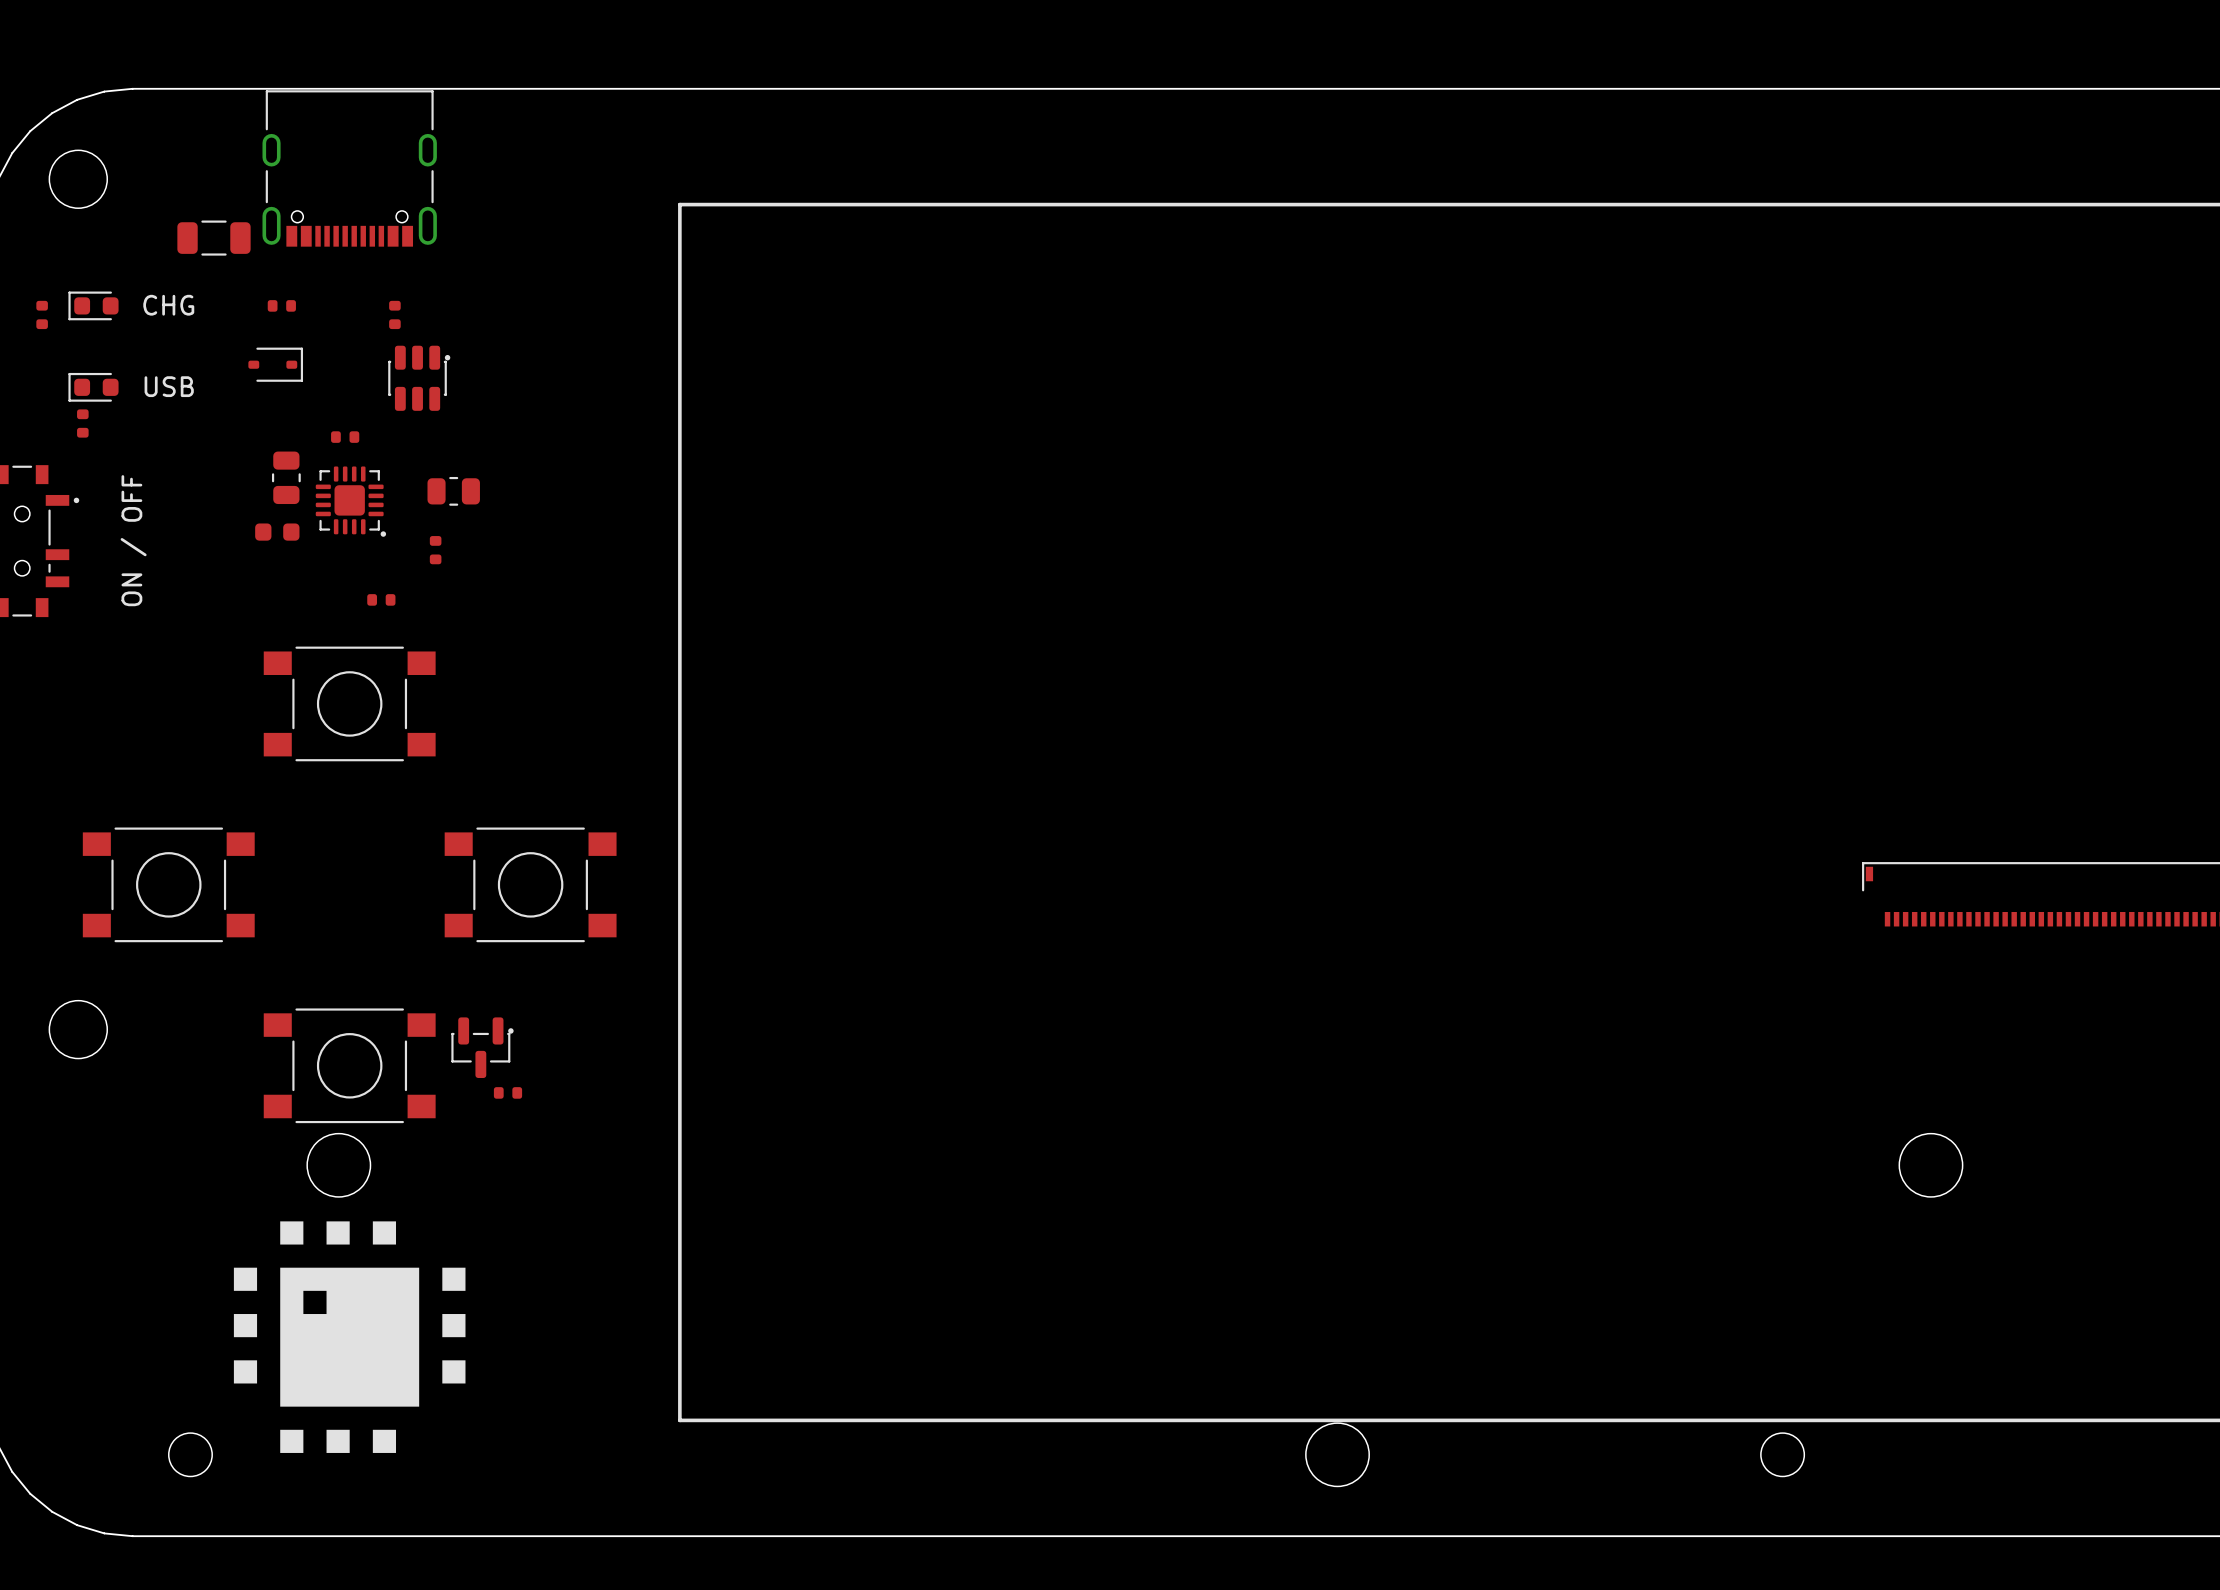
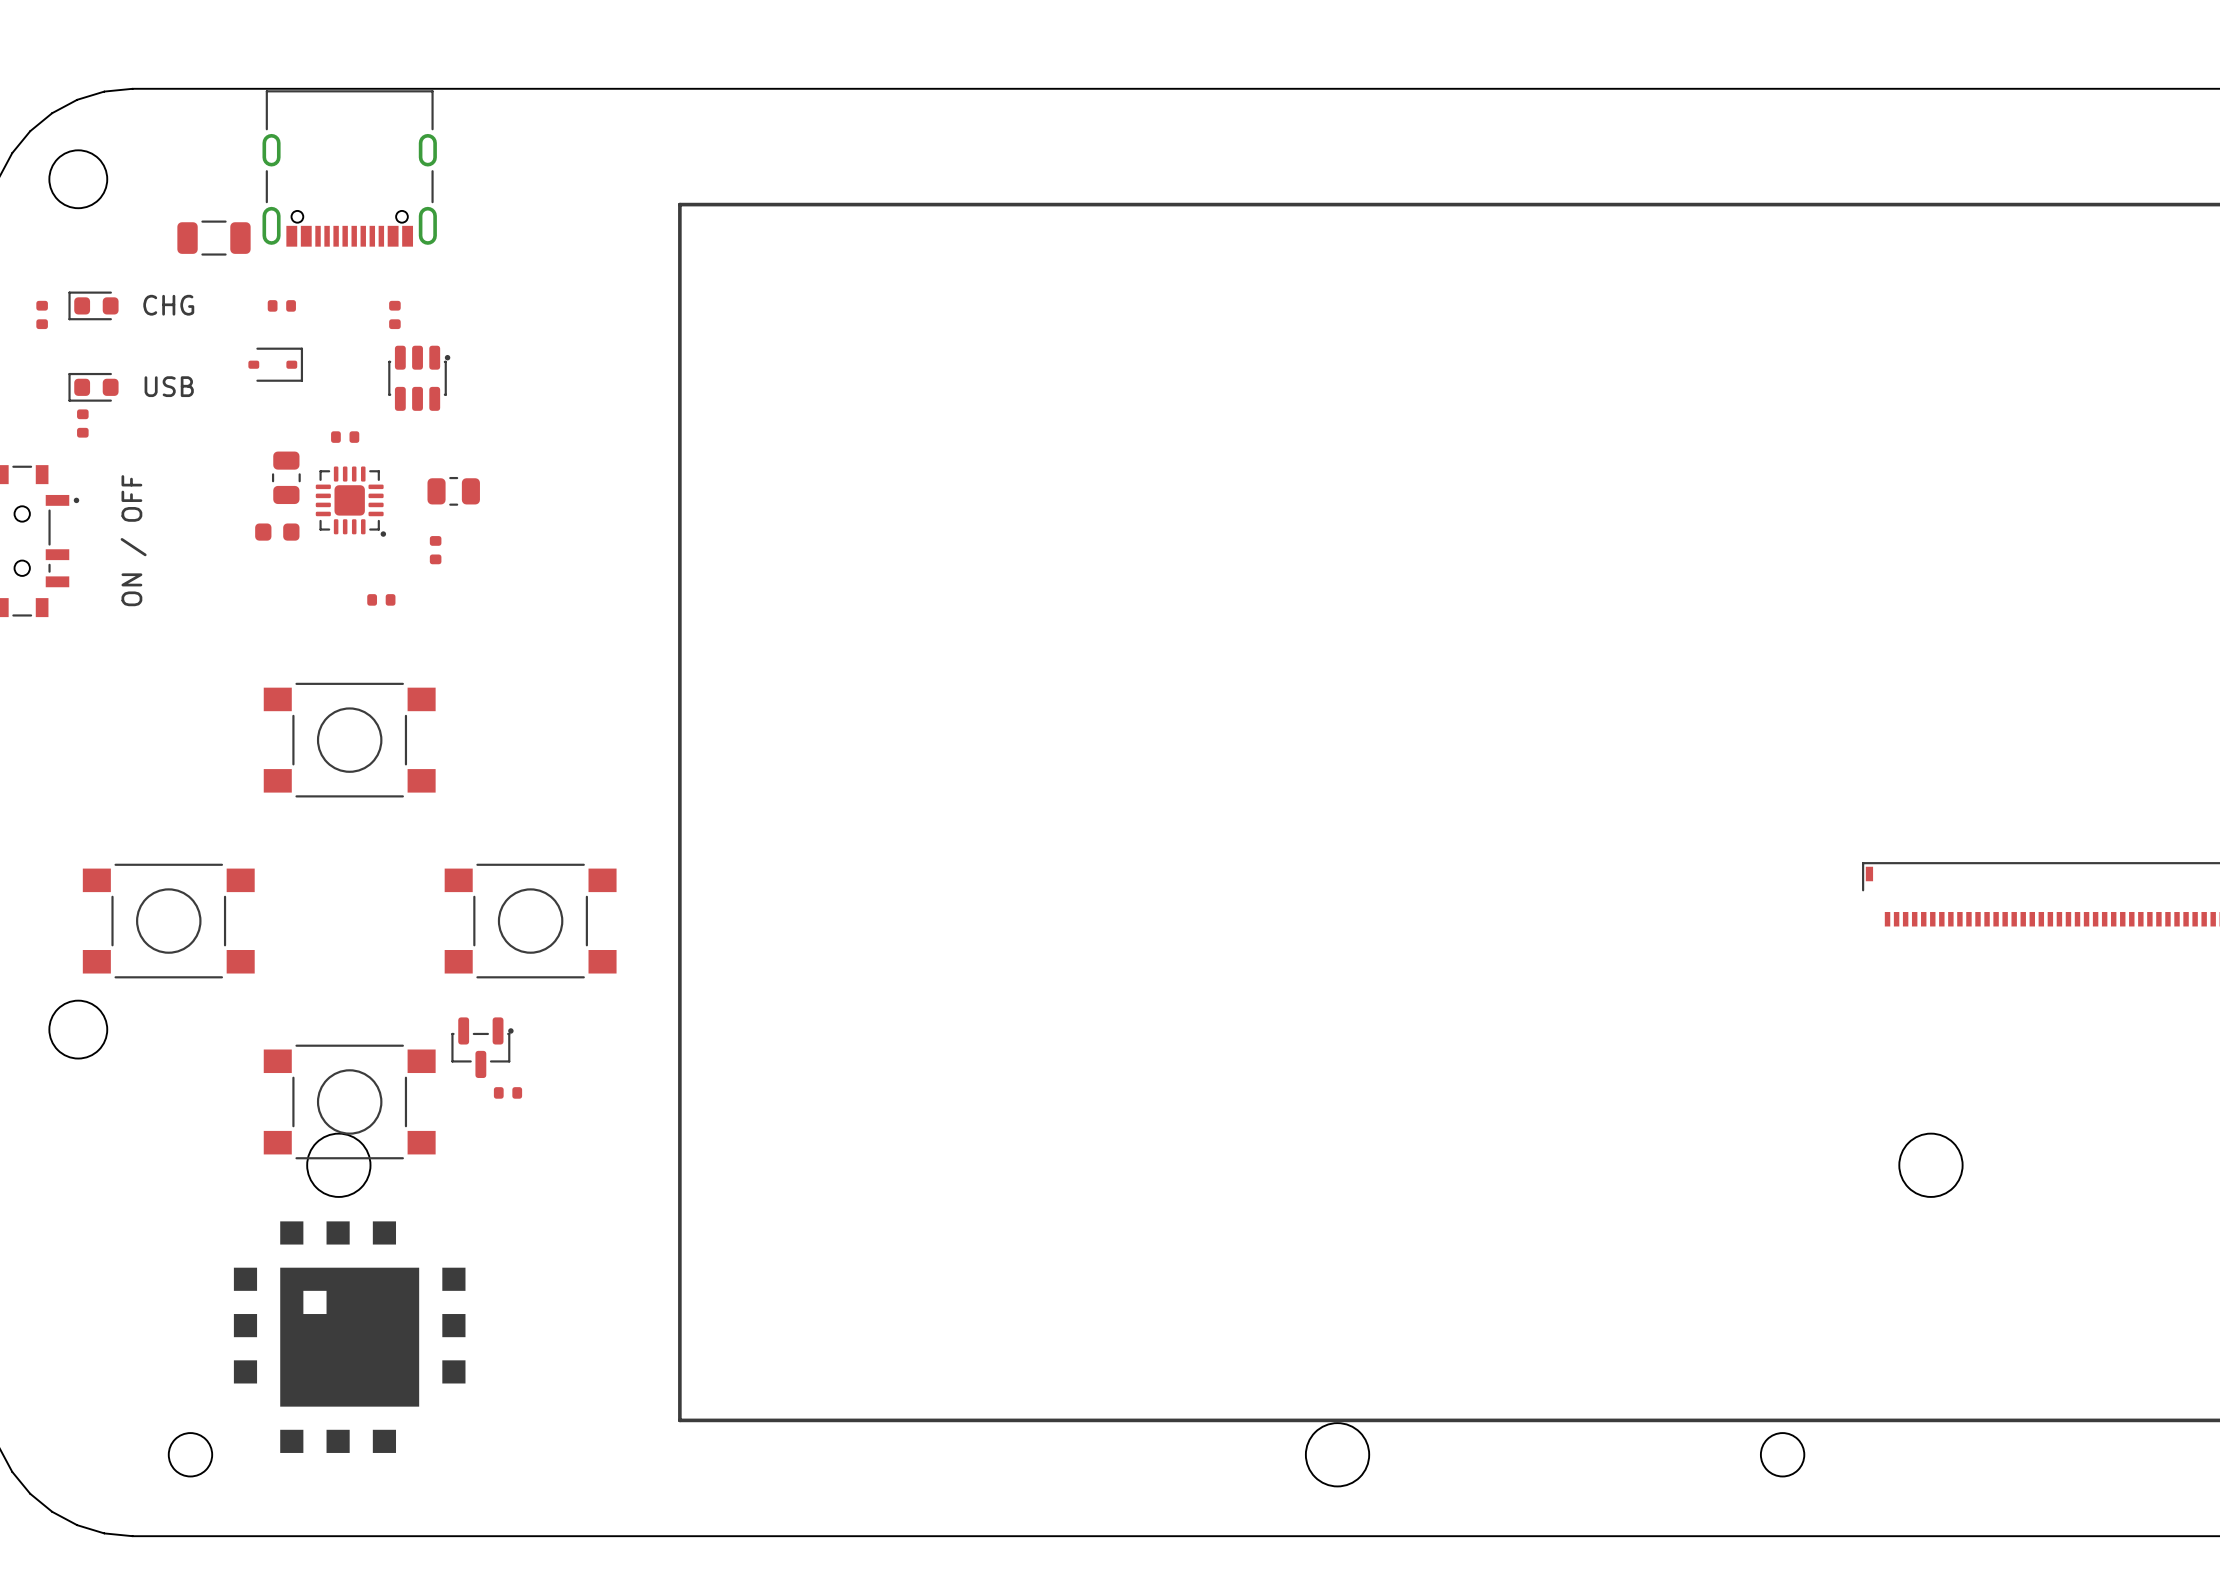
part position: (349, 703) -> (349, 740)
part position: (168, 884) -> (168, 921)
part position: (530, 884) -> (530, 921)
part position: (349, 1065) -> (349, 1101)

